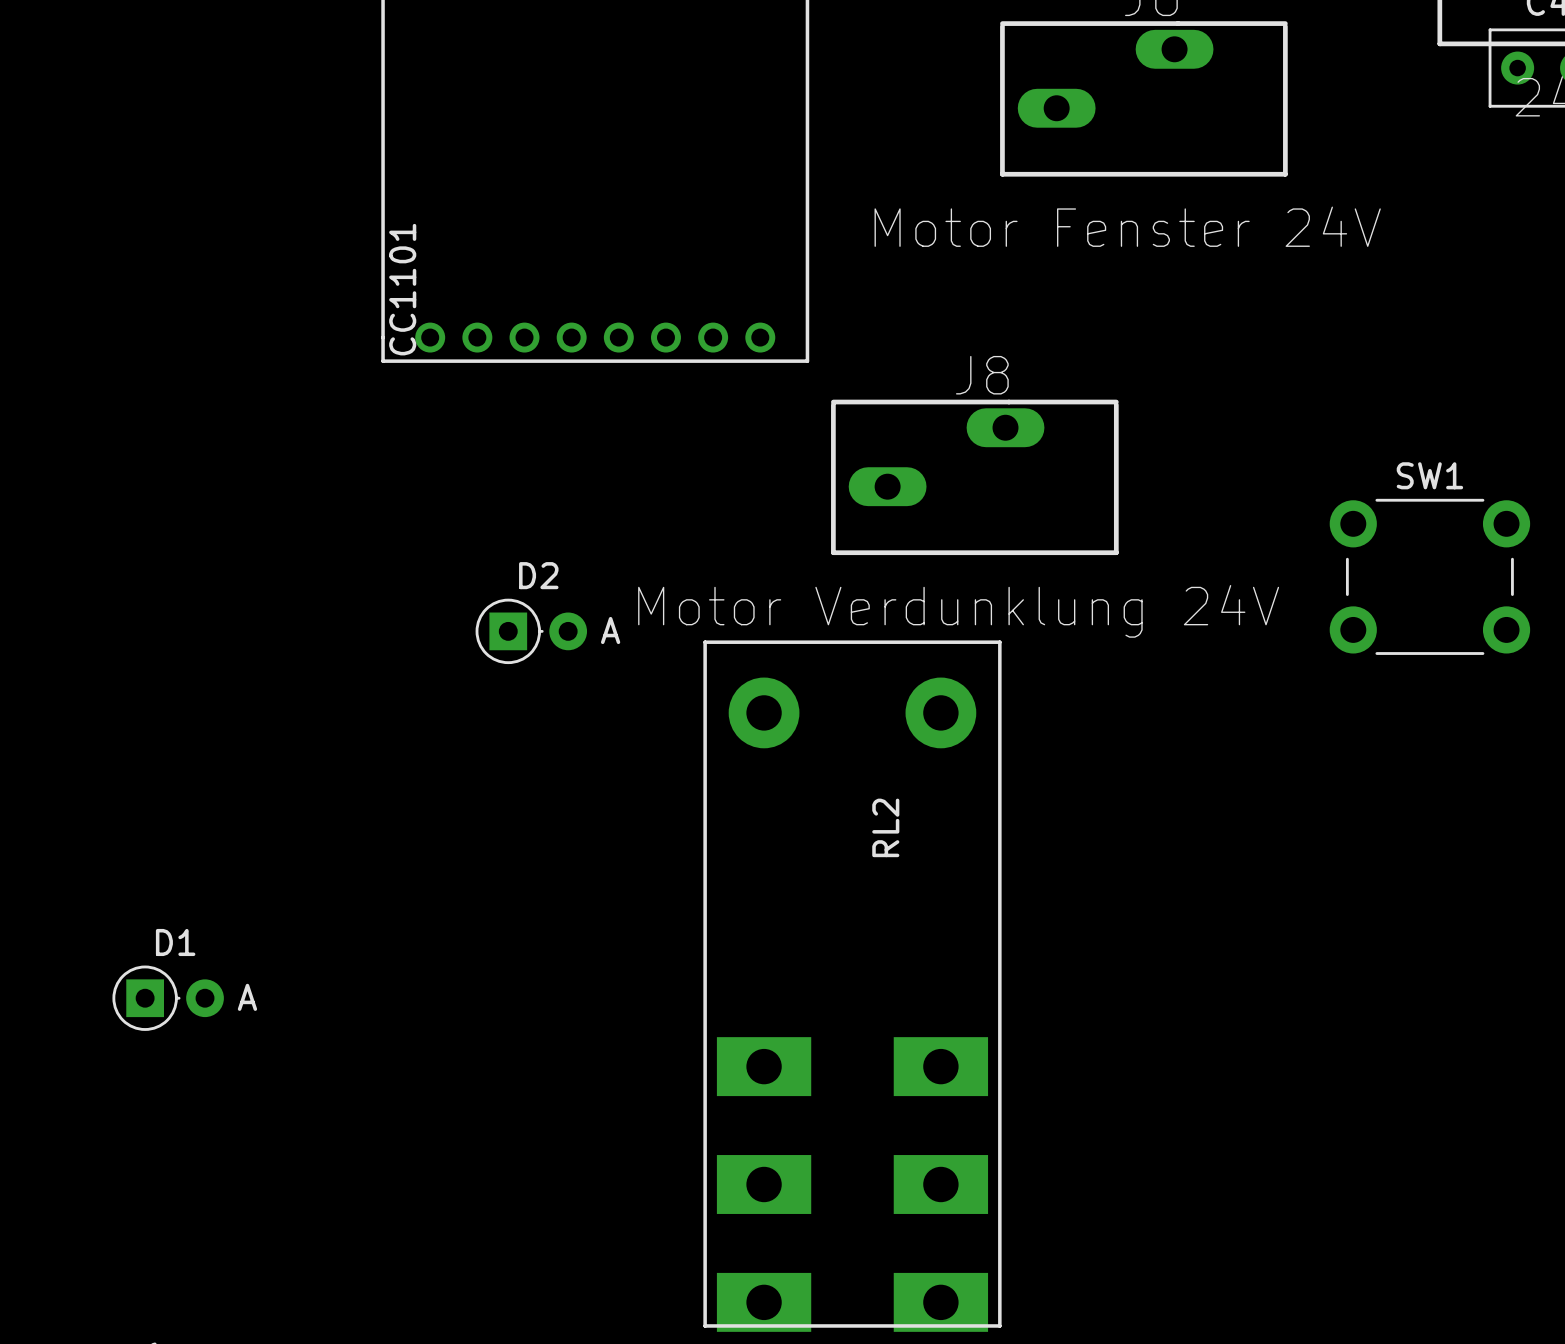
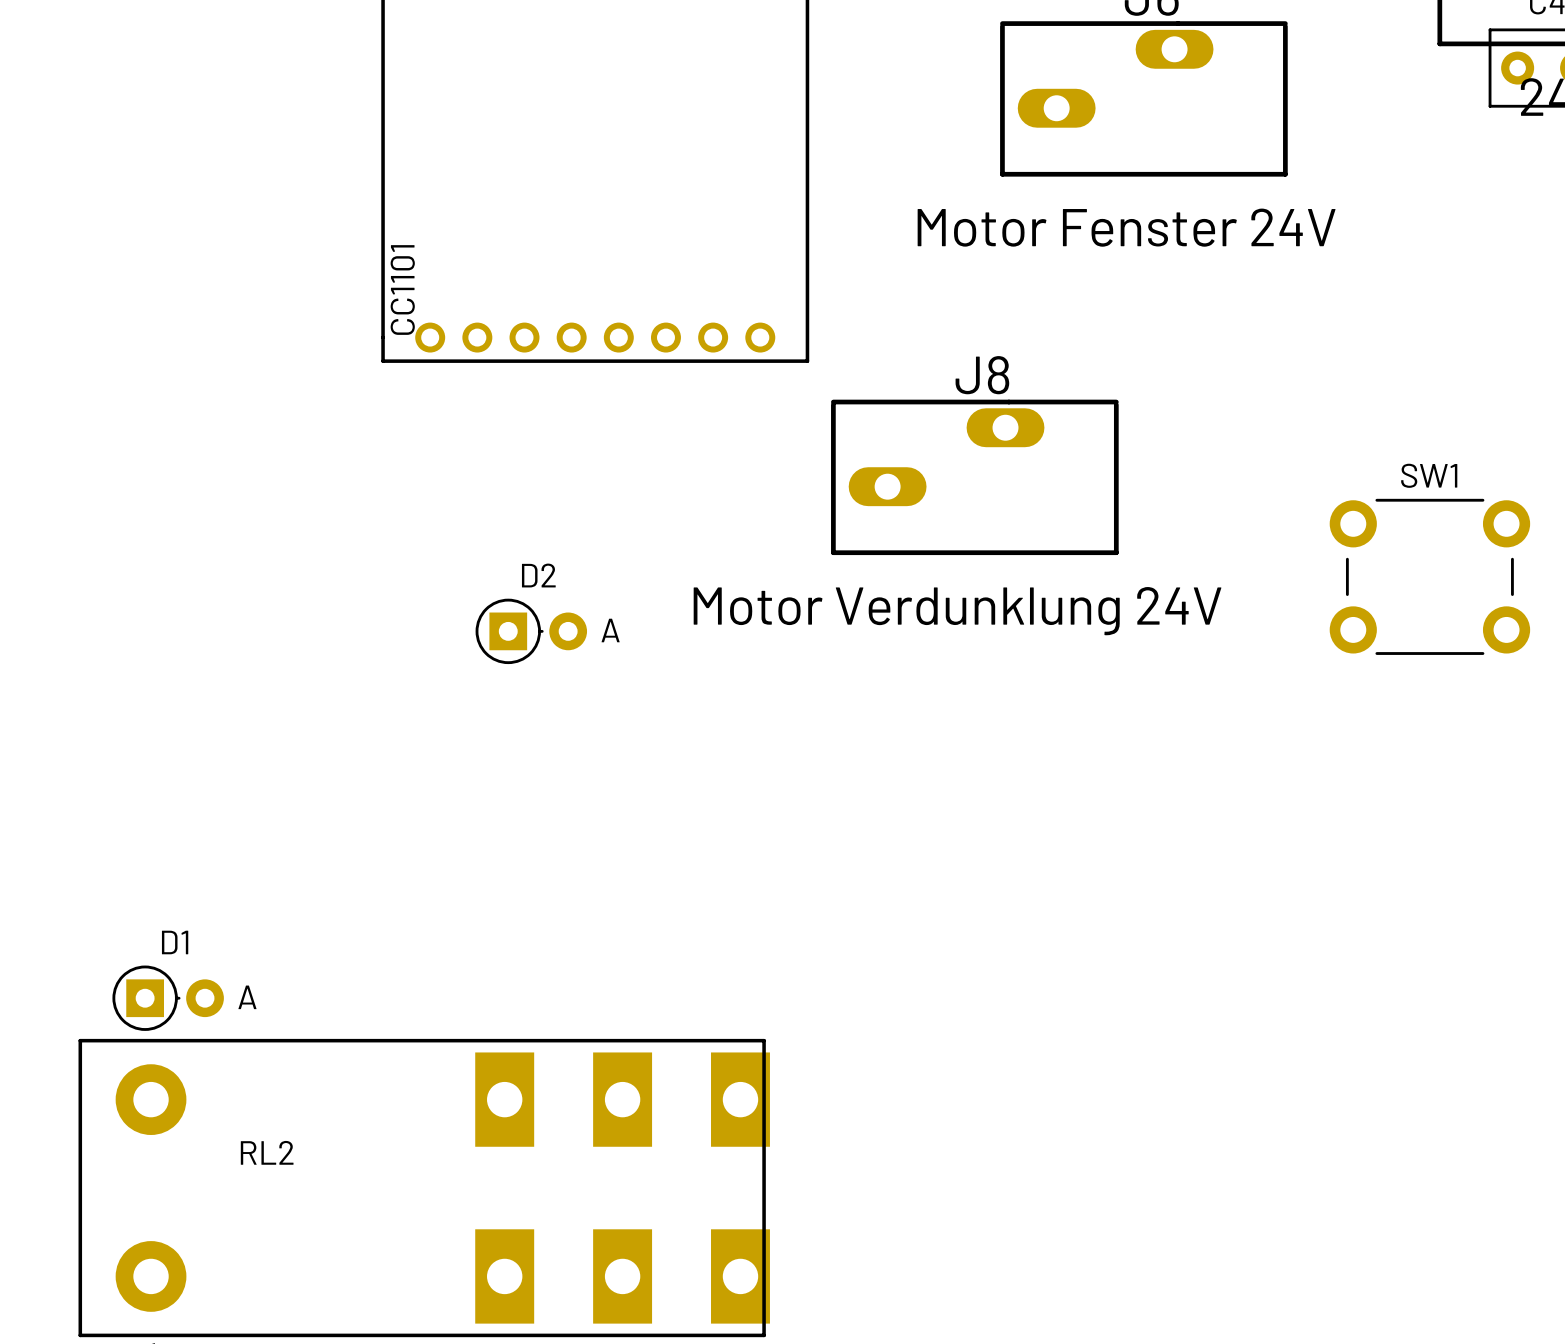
RL2 rotation: 0° (852, 986) -> 90° counterclockwise (424, 1188)
RL2 position: (852, 986) -> (424, 1188)

